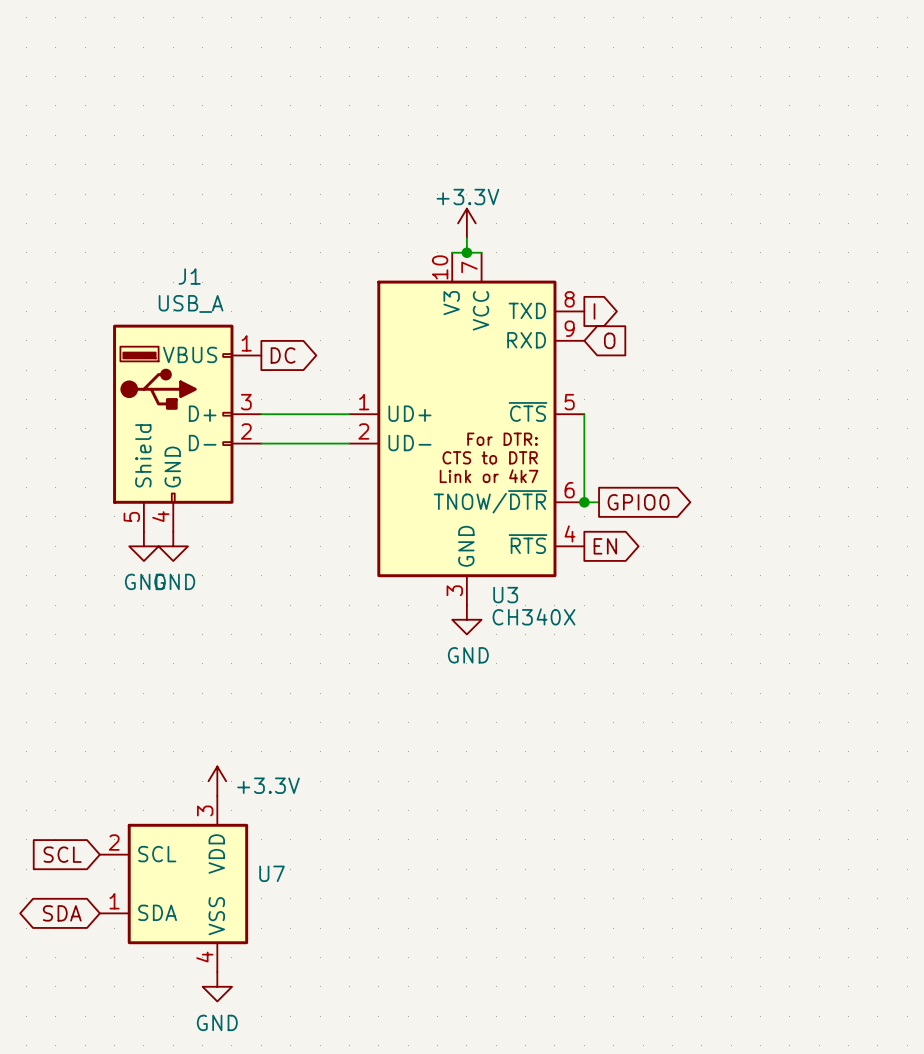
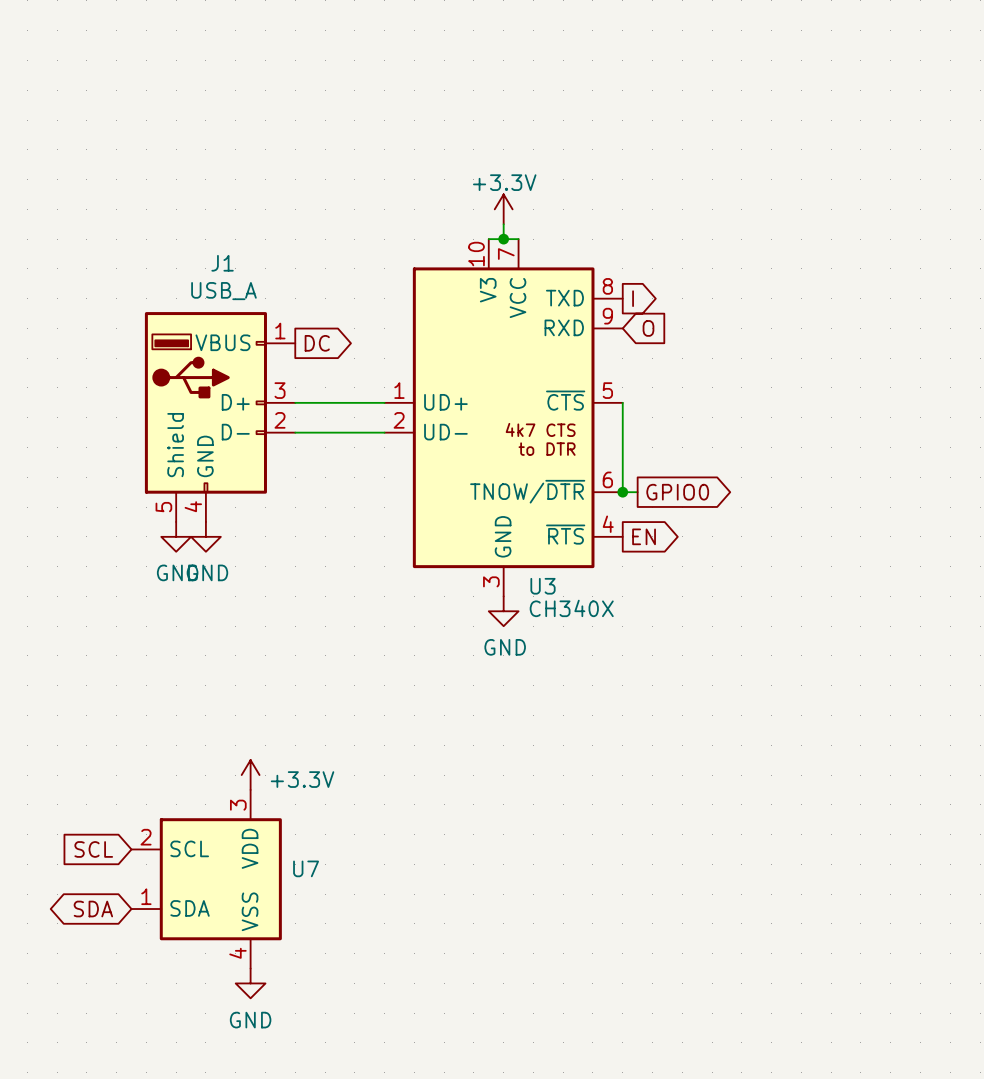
U3 text: For DTR: (502, 439) -> none
U3 text: none -> 4k7 CTS (540, 429)
U3 text: CTS to DTR (490, 457) -> none
U3 text: none -> to DTR (547, 449)
U3 text: Link or 4k7 (489, 476) -> none

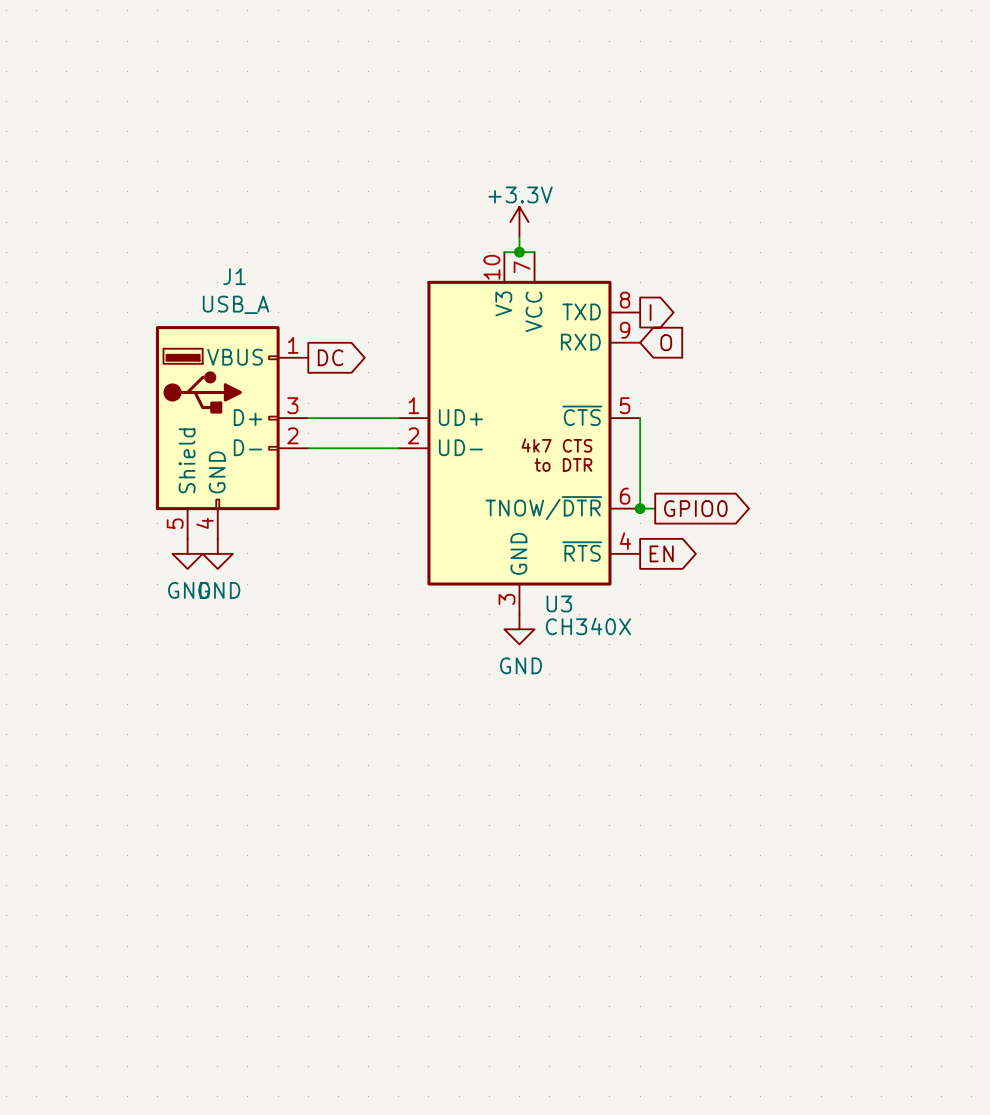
power symbol: +3.3V (250, 775) -> none
global label: SCL (93, 849) -> none
U7: (206, 879) -> none
global label: SDA (93, 909) -> none
power symbol: GND (250, 983) -> none

